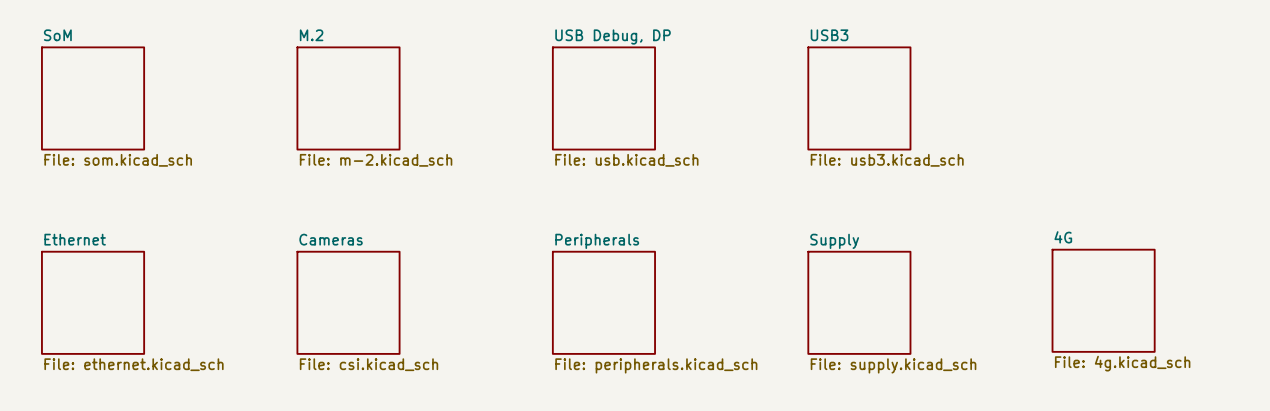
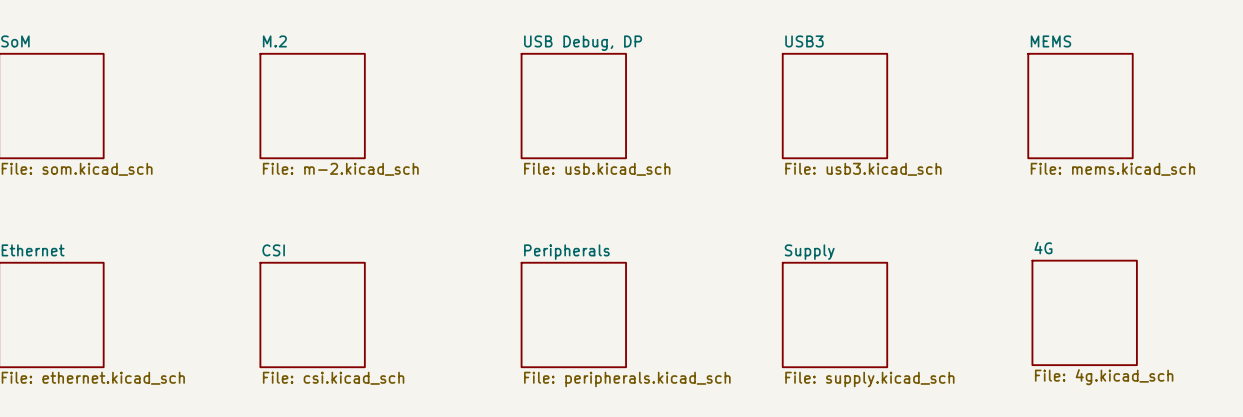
sheet MEMS: none -> File: mems.kicad_sch (1080, 106)
sheet Cameras name: Cameras (331, 239) -> CSI (273, 250)

